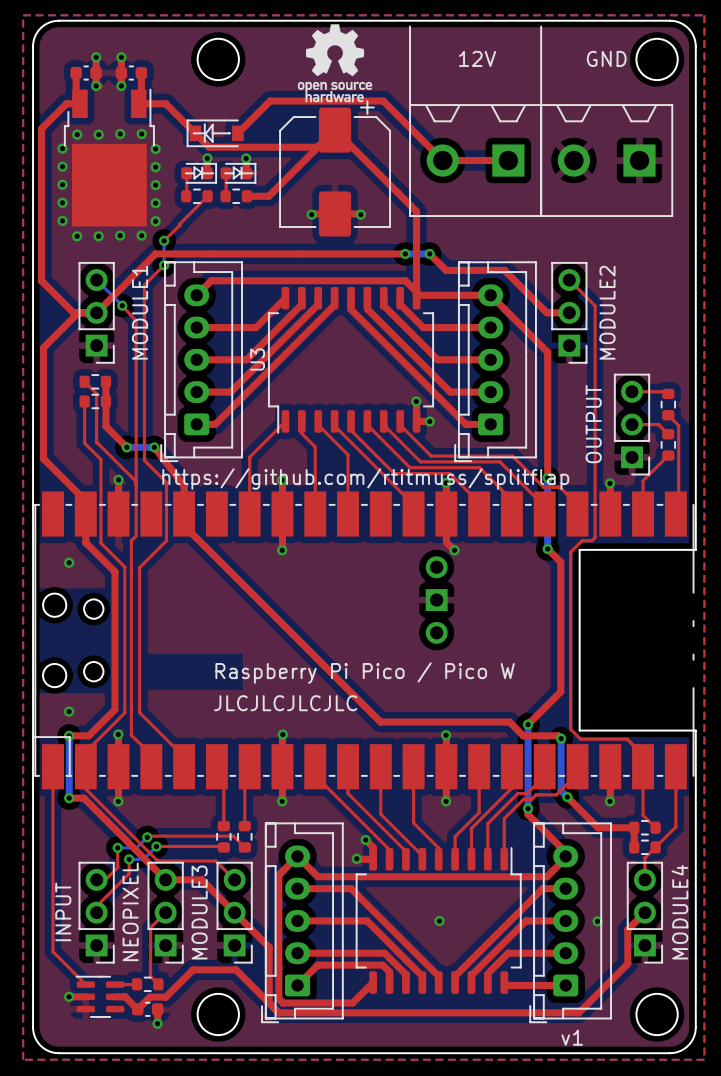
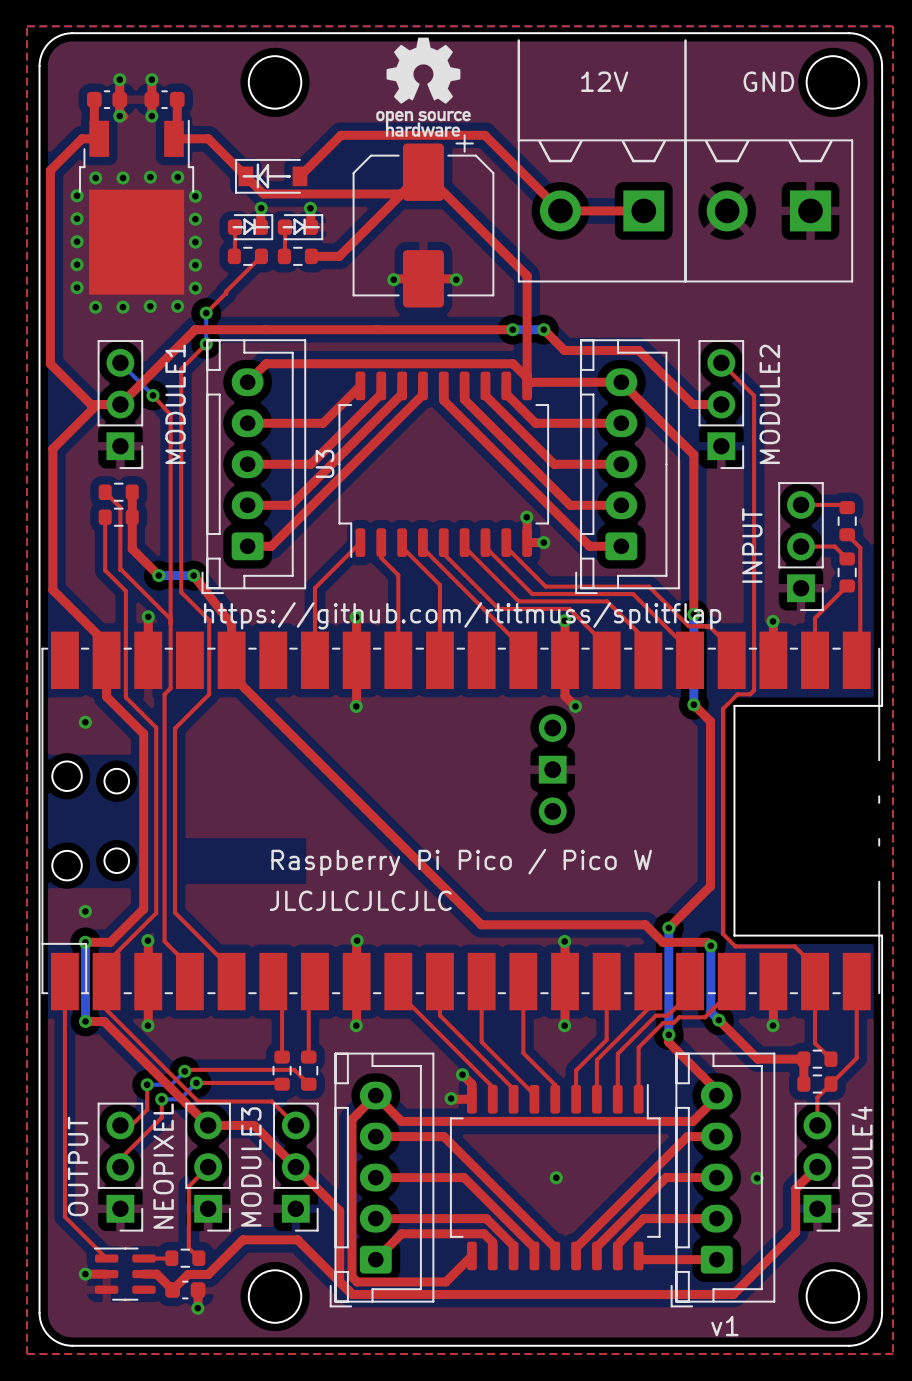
text: OUTPUT (593, 424) -> INPUT (752, 545)
text: INPUT (63, 911) -> OUTPUT (78, 1166)

